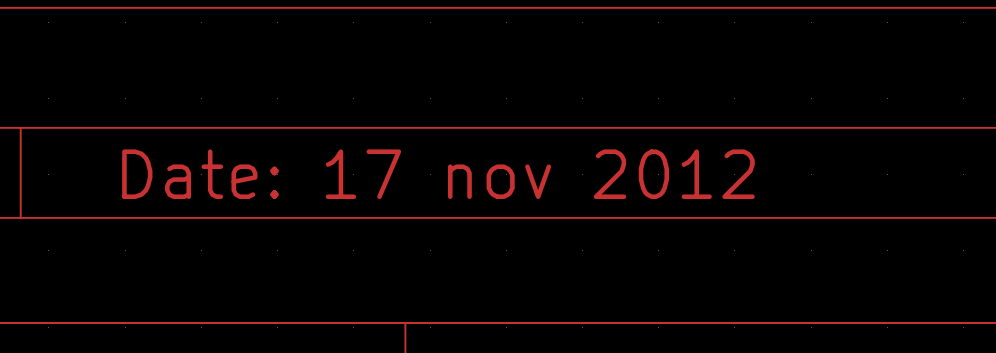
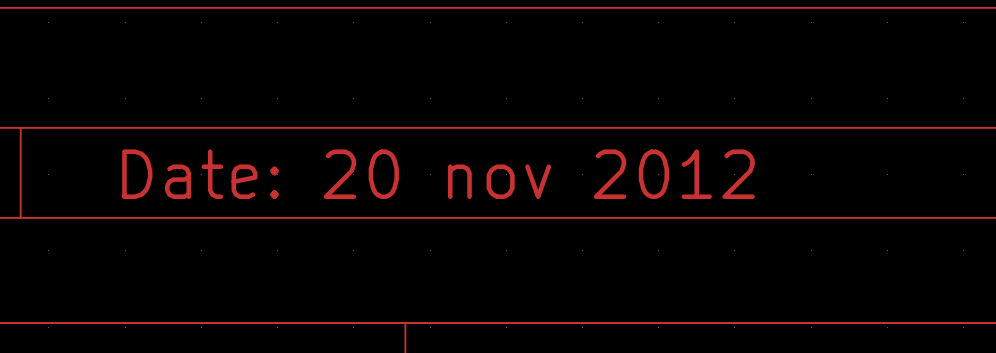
title block: Date: 17 nov 2012 (438, 174) -> Date: 20 nov 2012 (438, 174)

